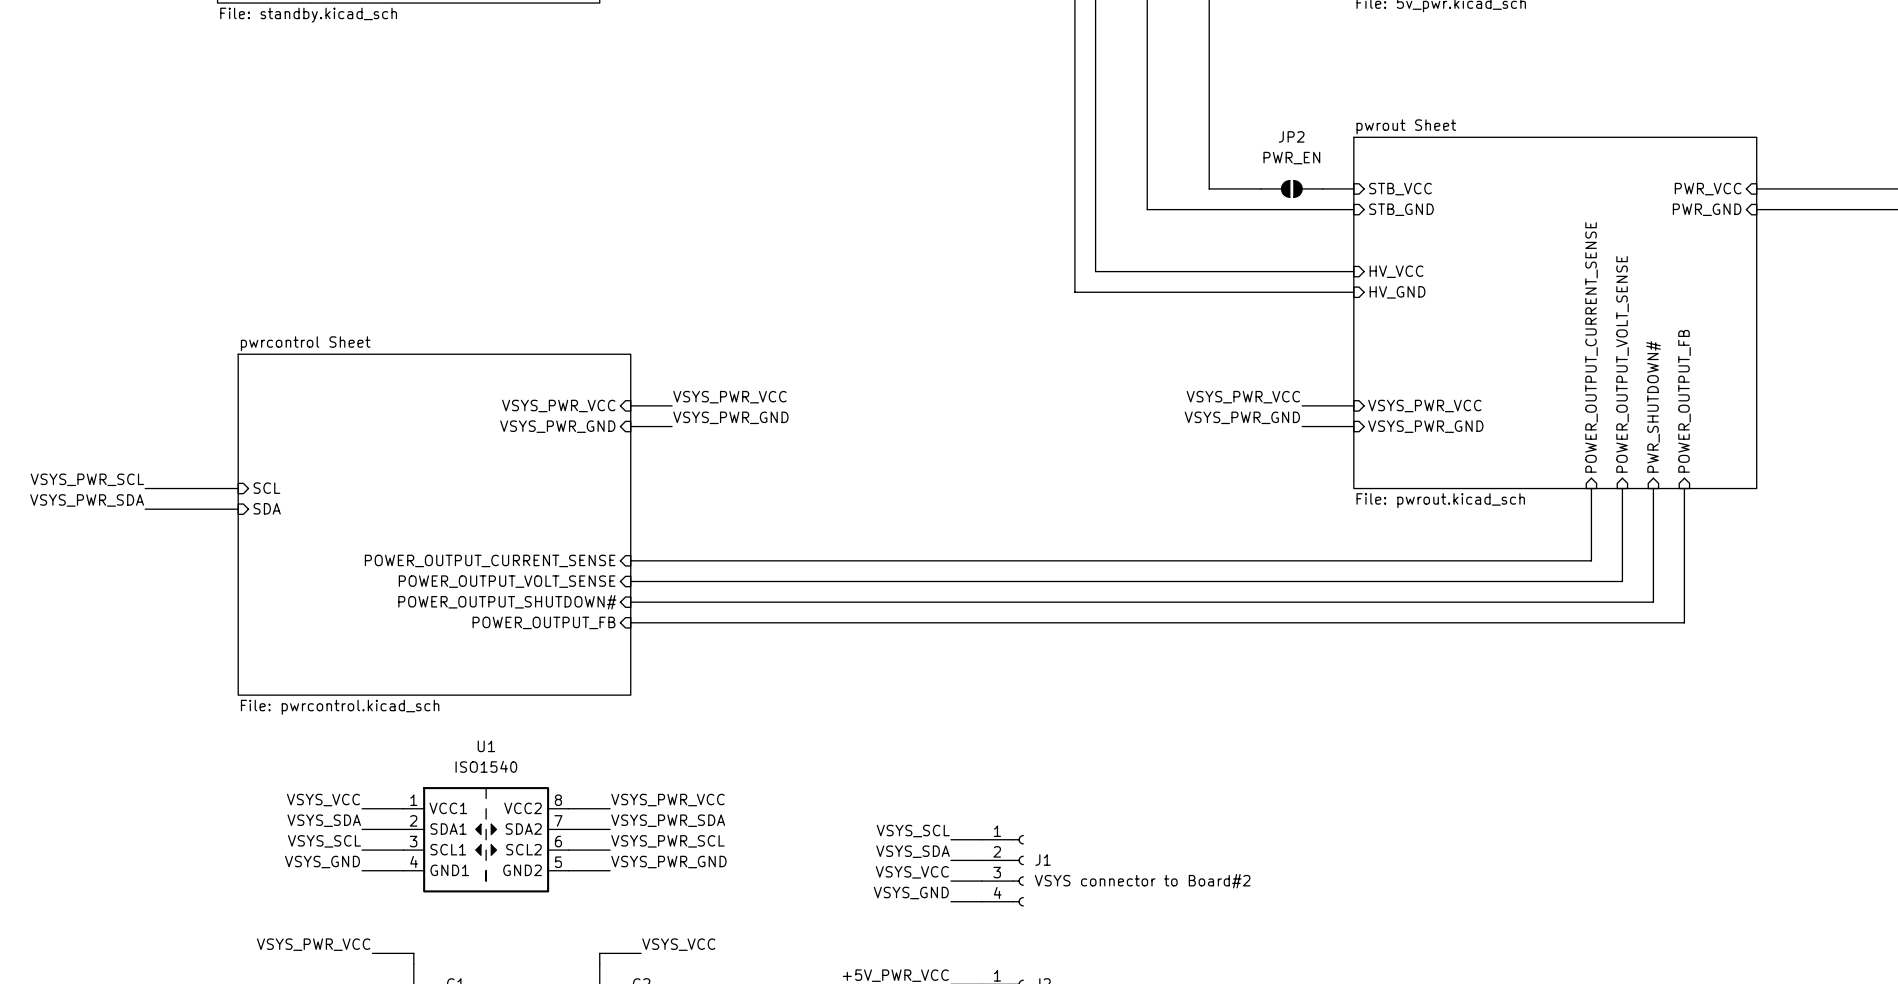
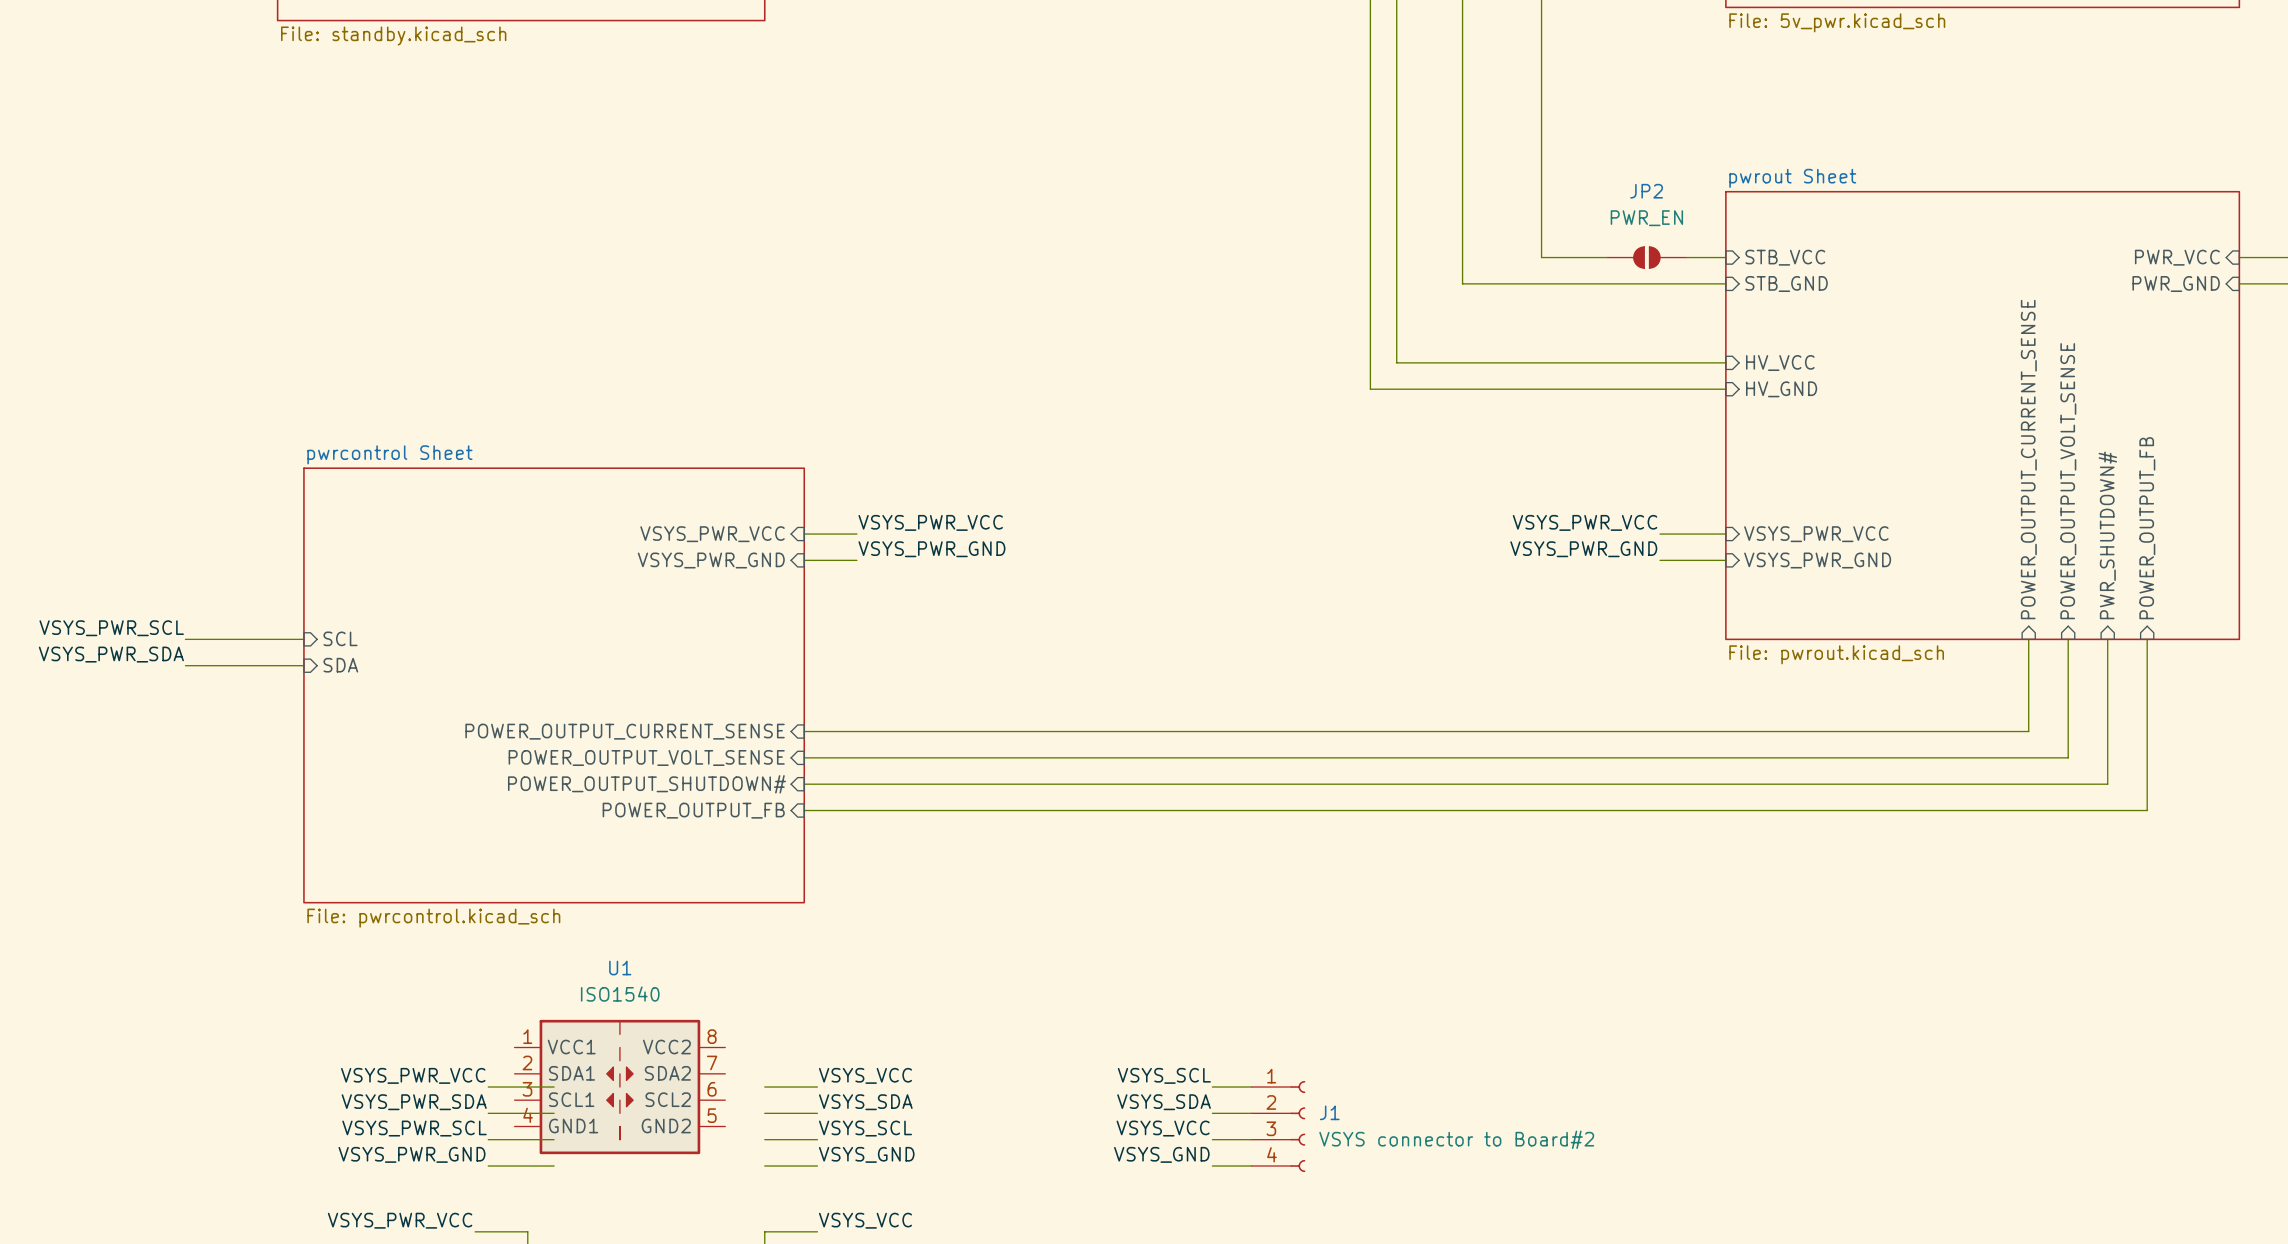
label: VSYS_VCC (323, 800) -> none
label: VSYS_PWR_VCC (667, 800) -> none
wire: (362, 808) (403, 808) -> none
wire: (568, 808) (610, 808) -> (764, 1087) (817, 1087)
label: VSYS_SDA (324, 820) -> none
label: VSYS_PWR_SDA (668, 820) -> none
wire: (362, 829) (403, 829) -> none
wire: (568, 829) (610, 829) -> (764, 1113) (817, 1113)
label: none -> VSYS_PWR_VCC (413, 1075)
label: none -> VSYS_VCC (865, 1075)
wire: none -> (488, 1087) (554, 1087)
label: VSYS_SCL (324, 841) -> none
label: VSYS_PWR_SCL (667, 841) -> none
wire: (362, 850) (403, 850) -> none
wire: (568, 850) (610, 850) -> (764, 1139) (817, 1139)
label: none -> VSYS_PWR_SDA (414, 1102)
label: none -> VSYS_SDA (865, 1102)
wire: none -> (488, 1113) (554, 1113)
label: VSYS_GND (322, 862) -> none
label: VSYS_PWR_GND (668, 862) -> none
wire: (362, 870) (403, 870) -> none
wire: (568, 870) (610, 870) -> (764, 1166) (817, 1166)
label: none -> VSYS_PWR_SCL (414, 1128)
label: none -> VSYS_SCL (865, 1128)
wire: none -> (488, 1139) (554, 1139)
label: none -> VSYS_PWR_GND (412, 1154)
label: none -> VSYS_GND (866, 1154)
wire: none -> (488, 1166) (554, 1166)

